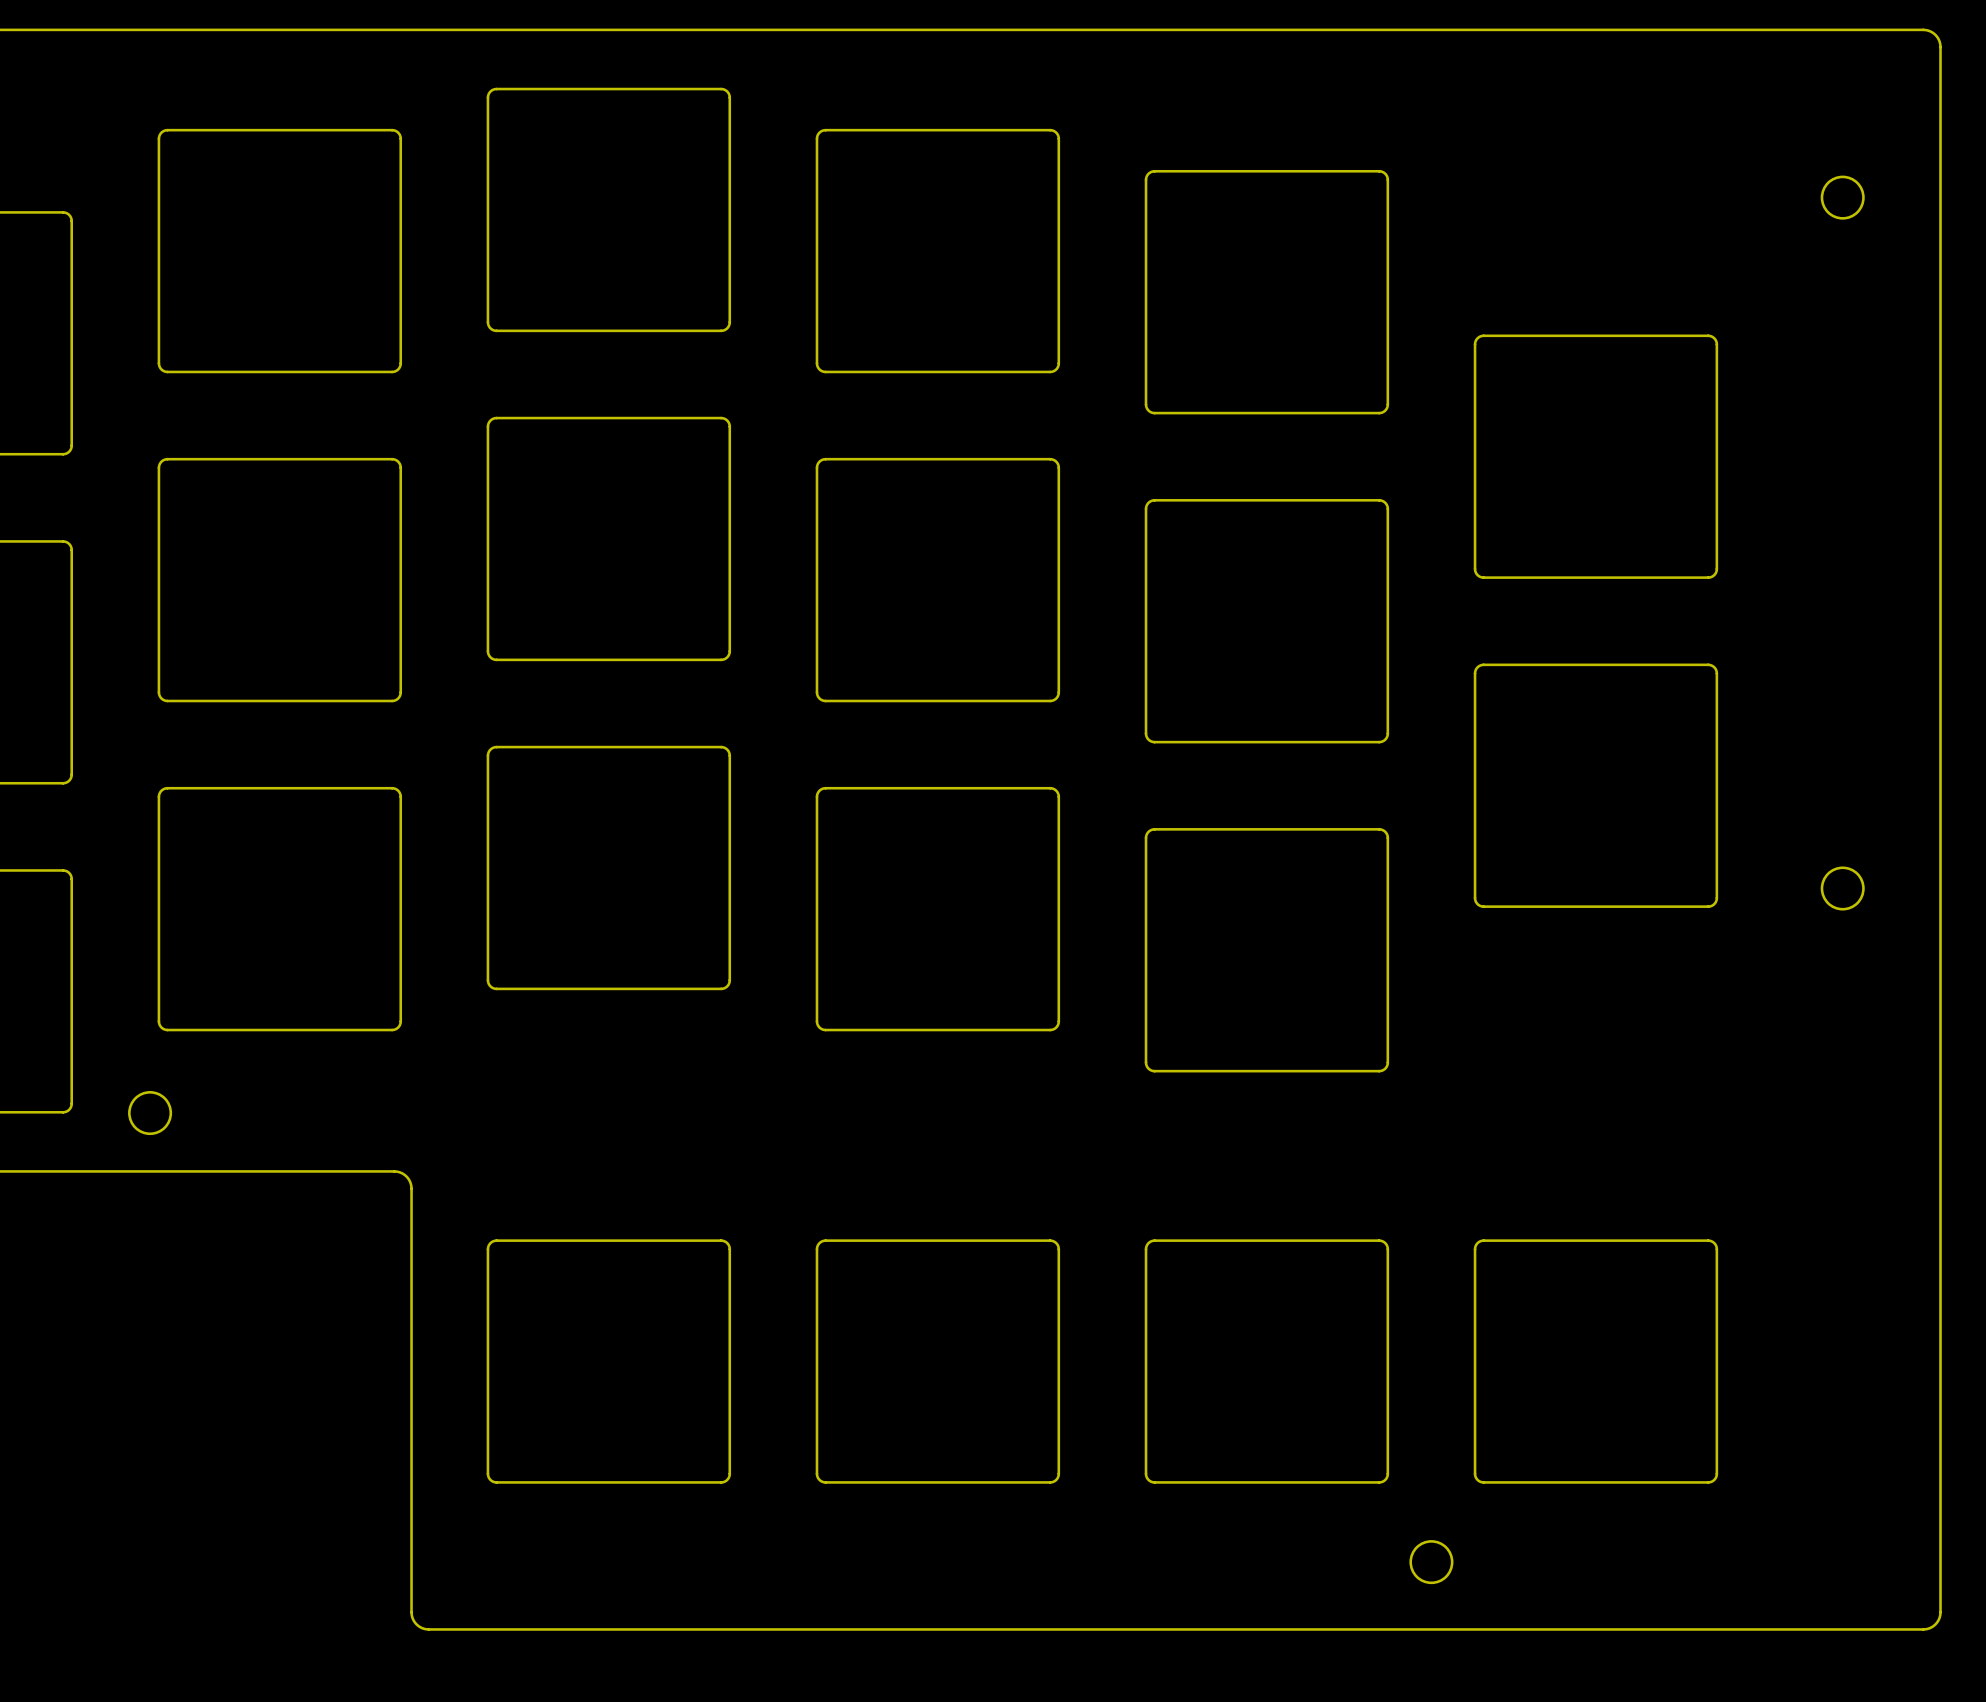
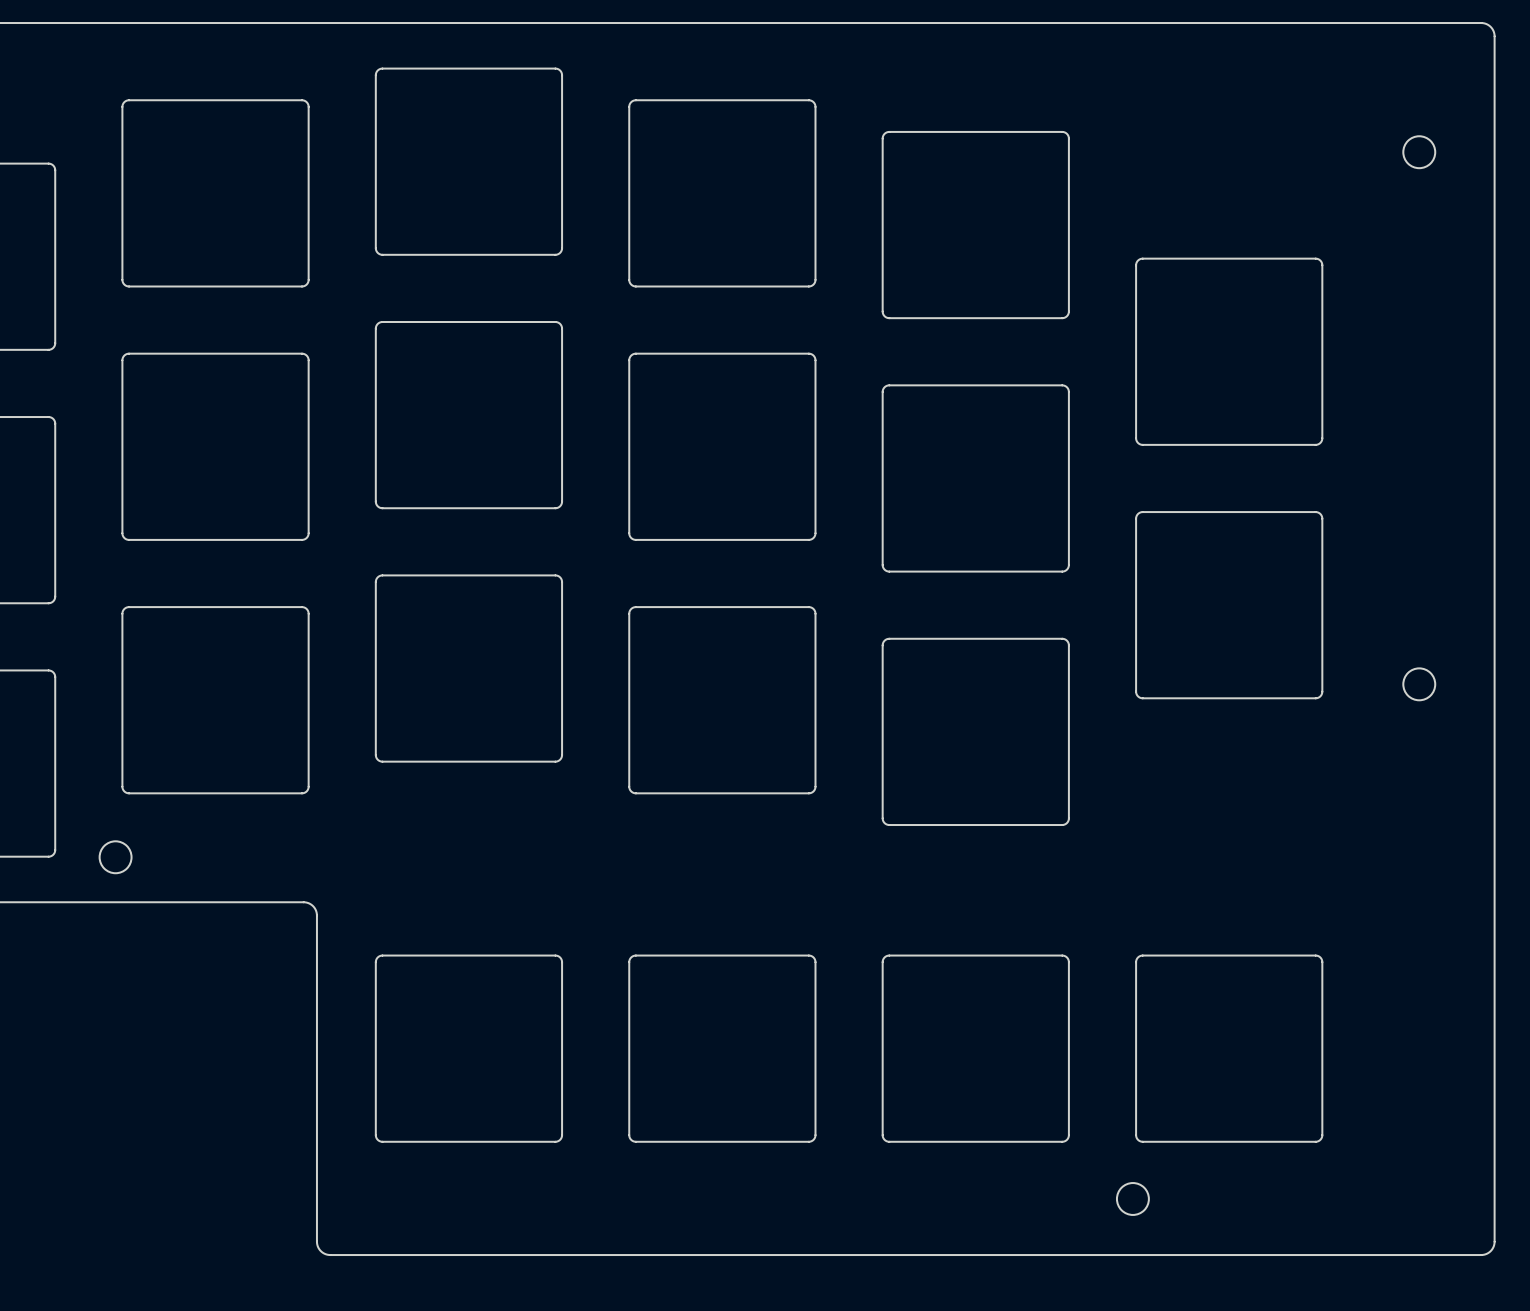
round board edge position: (1431, 1562) -> (1132, 1198)

